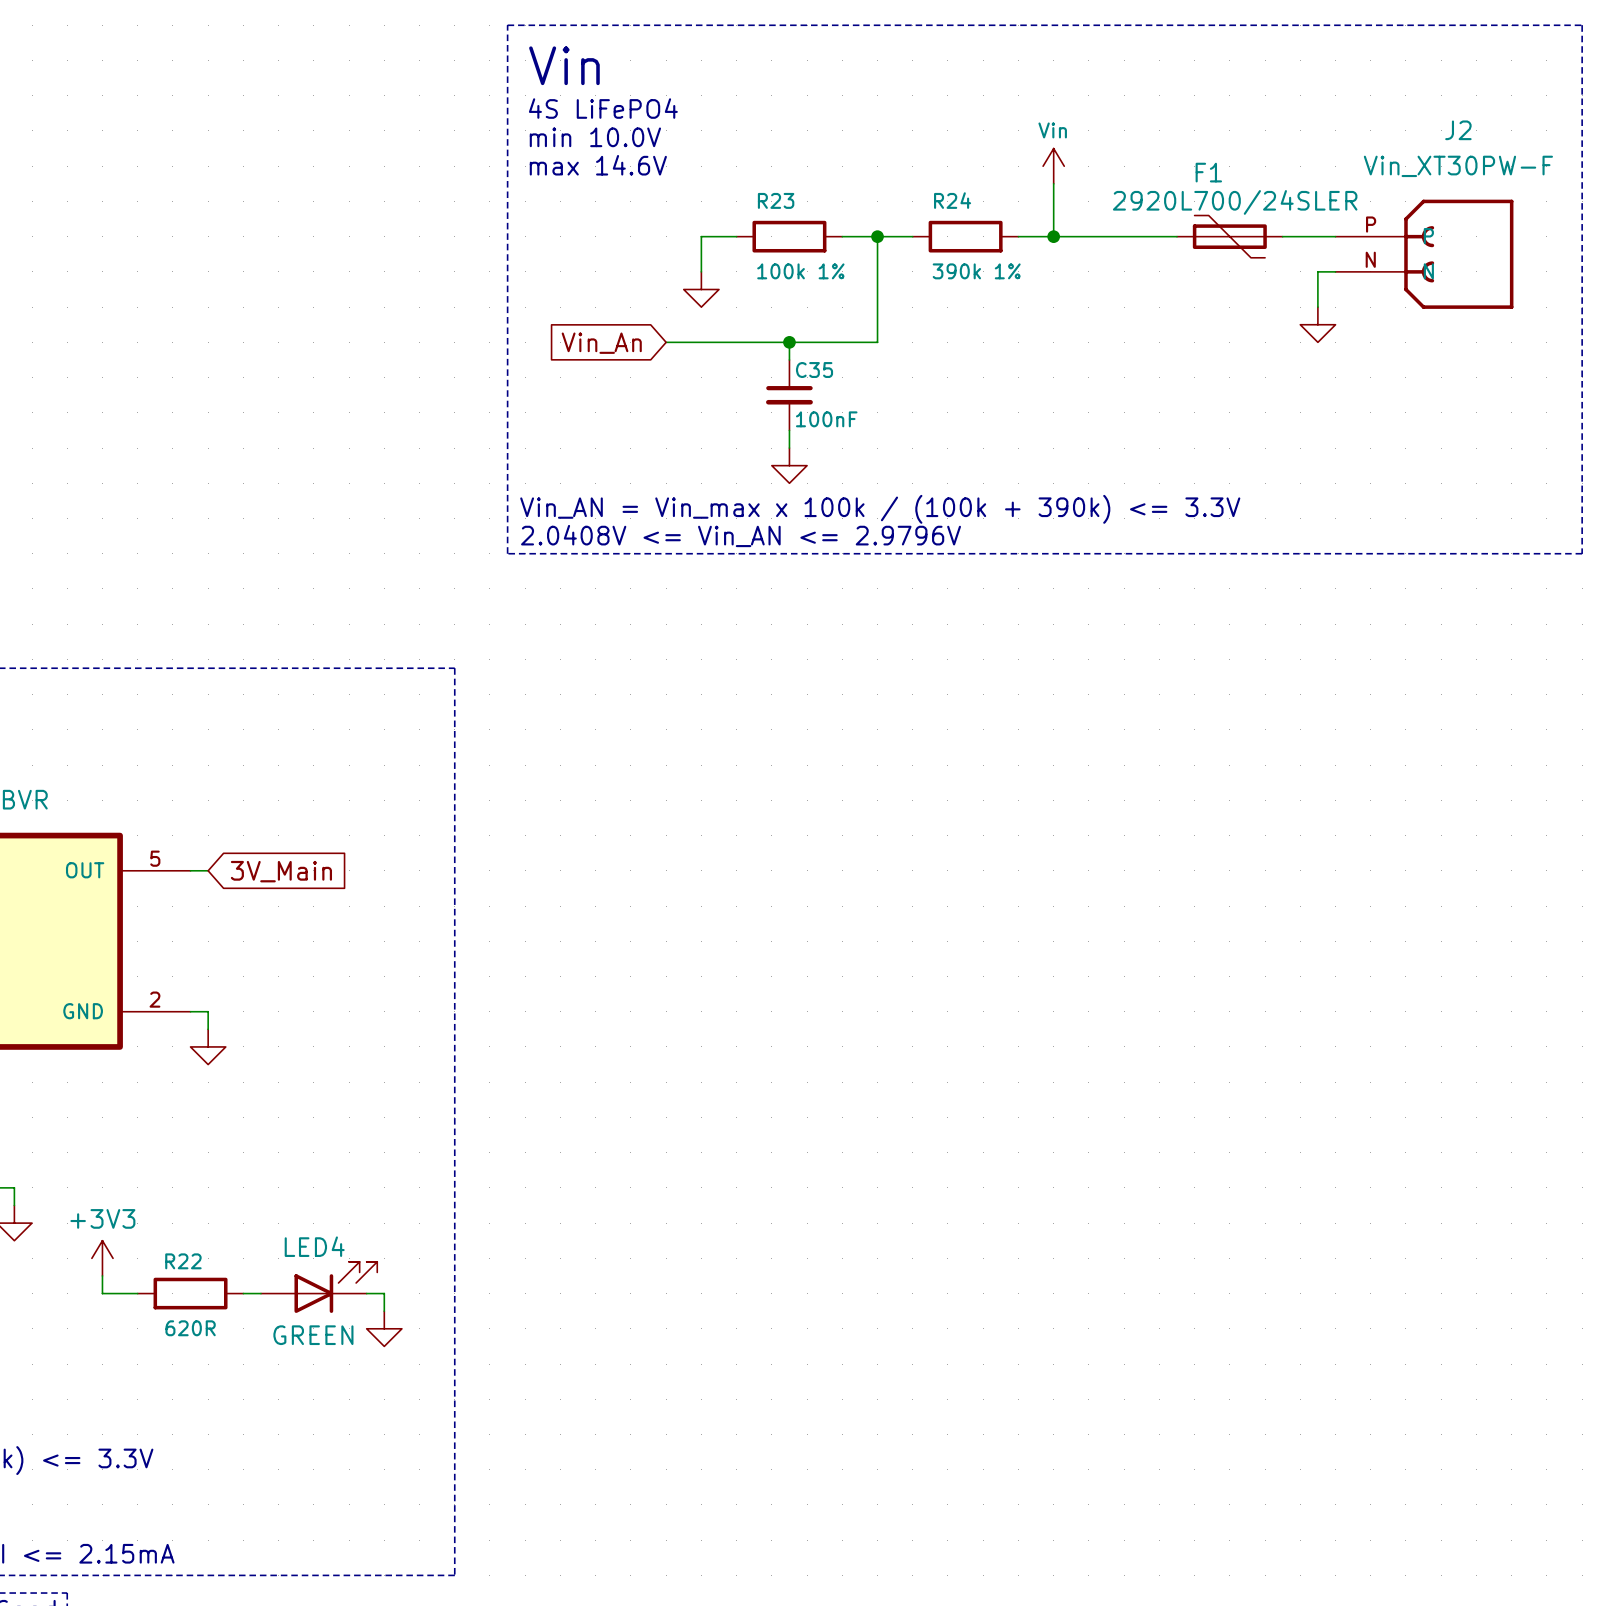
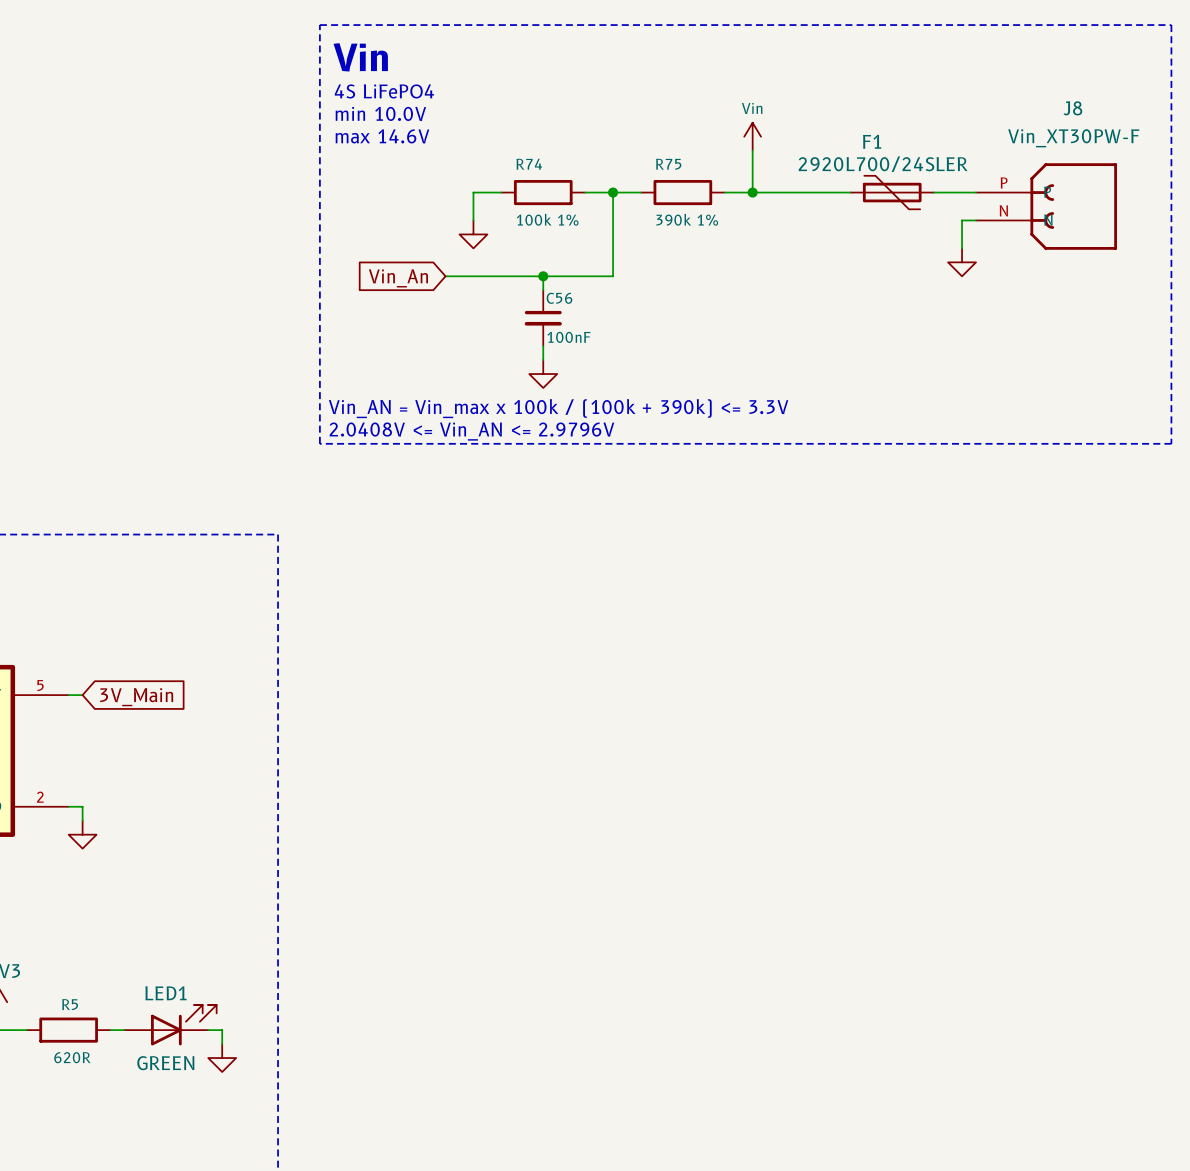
J2 name: J2 (1458, 130) -> J8 (1072, 108)
R23 name: R23 (776, 200) -> R74 (529, 164)
R24 name: R24 (952, 200) -> R75 (668, 164)
C35 name: C35 (814, 370) -> C56 (559, 298)
LED4 name: LED4 (314, 1246) -> LED1 (165, 993)
R22 name: R22 (183, 1261) -> R5 (70, 1004)

